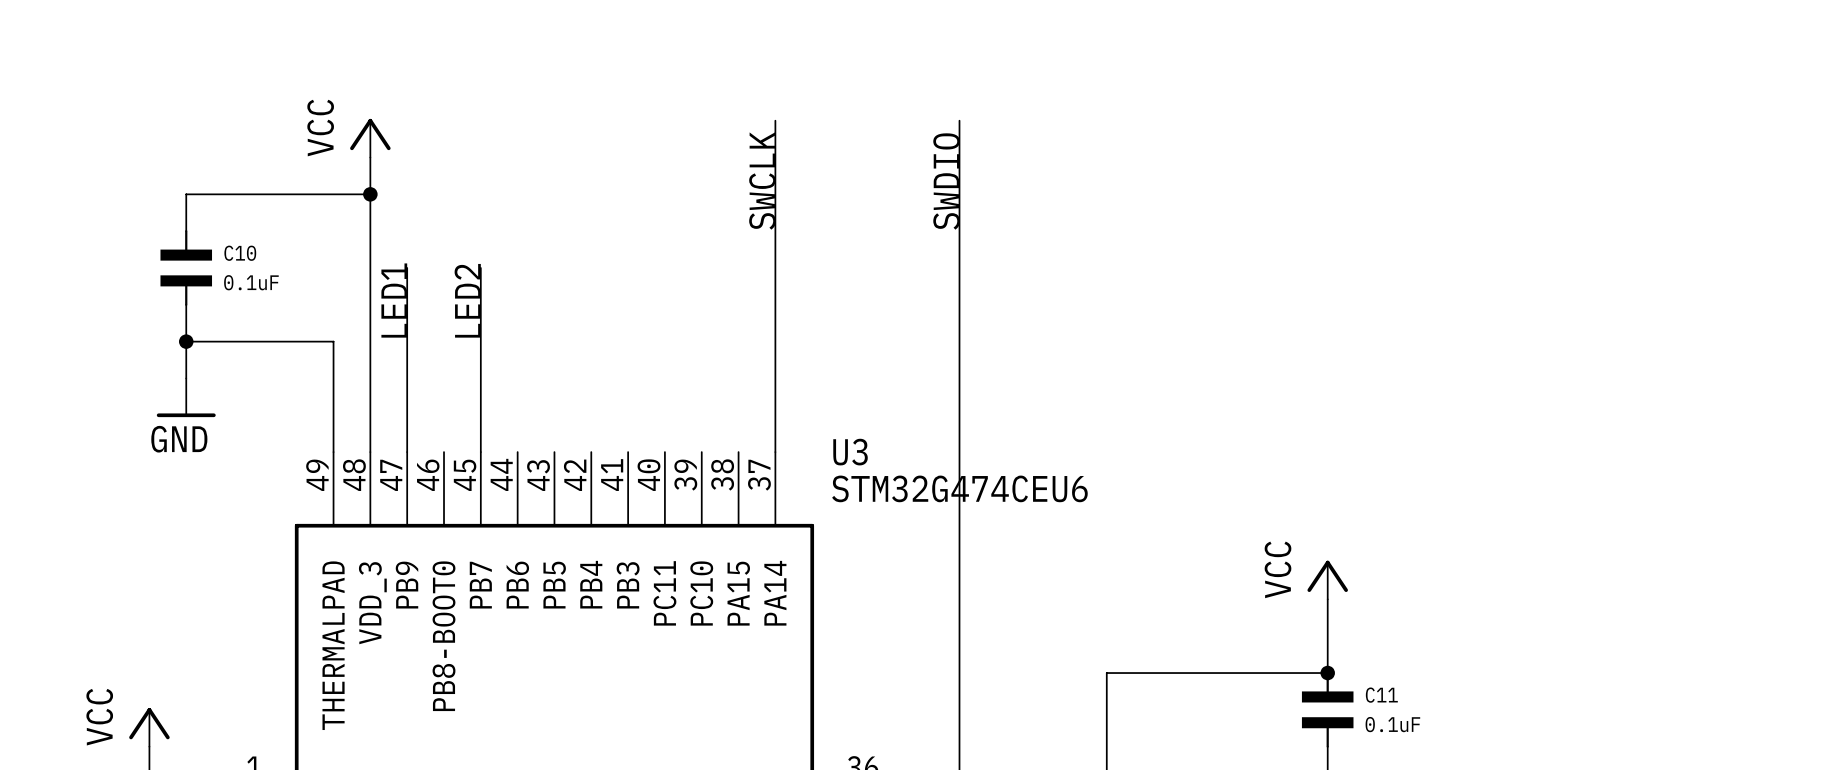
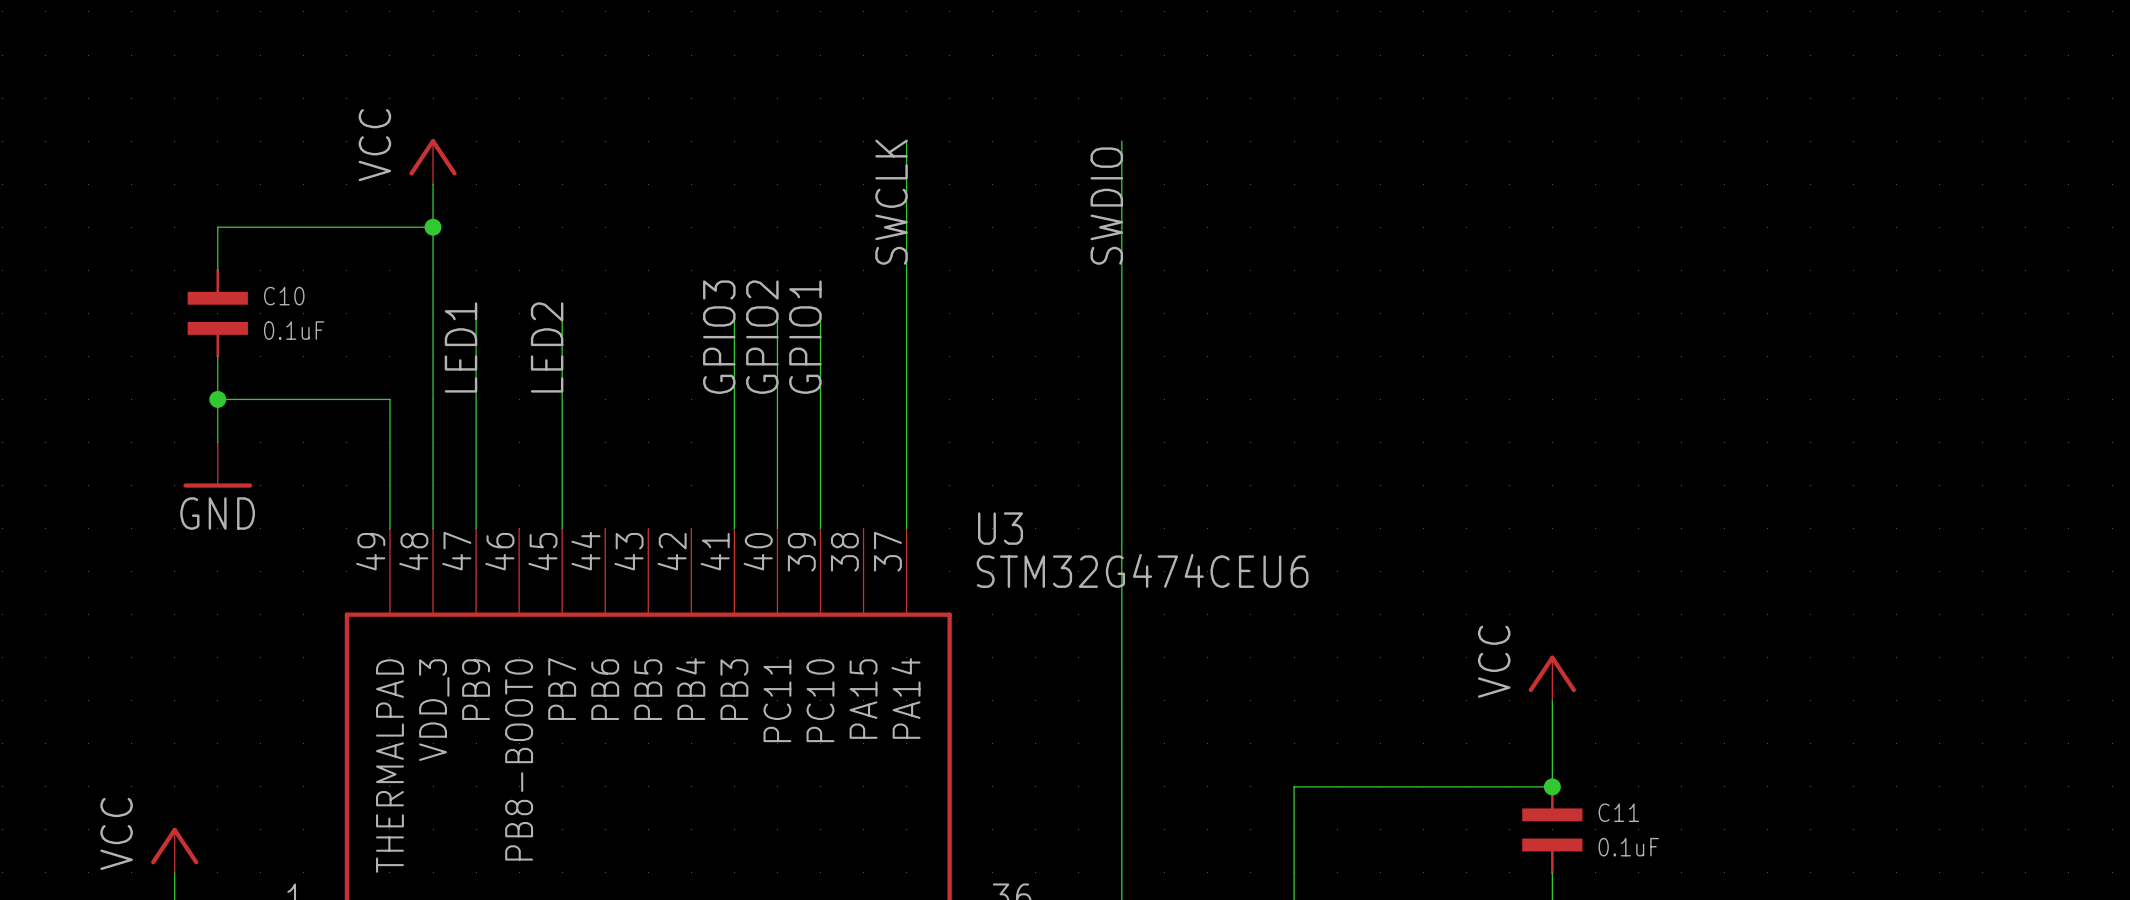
wire: none -> (734, 313) (734, 528)
wire: none -> (777, 313) (777, 528)
wire: none -> (820, 313) (820, 528)
label: none -> GPIO2 (762, 337)
label: none -> GPIO1 (805, 337)
label: none -> GPIO3 (719, 337)

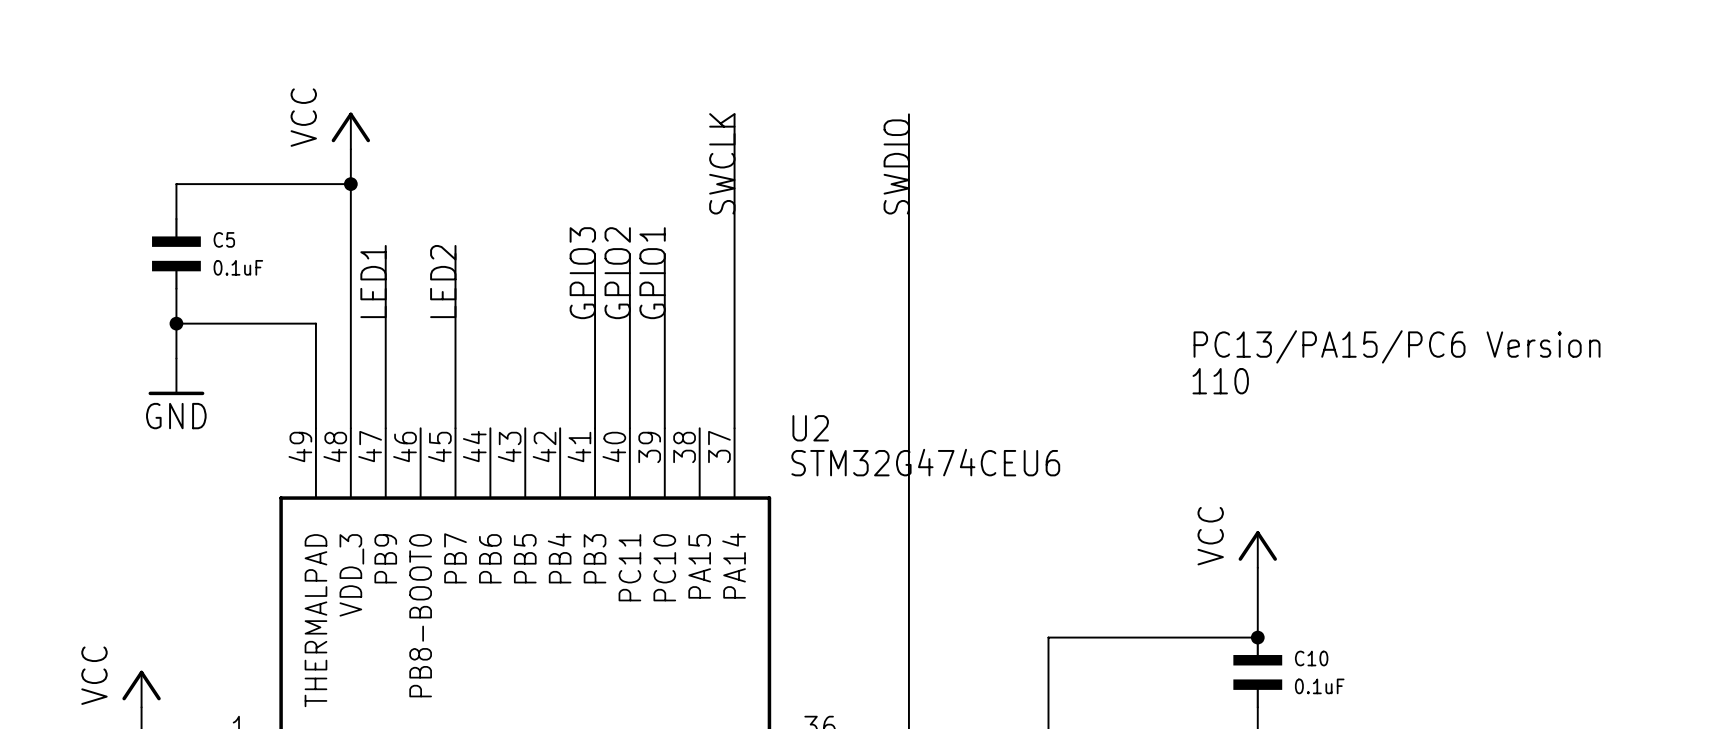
C10 name: C10 (284, 296) -> C5 (224, 239)
text: none -> PC13/PA15/PC6 Version (1397, 346)
text: none -> 110 (1220, 381)
U3 name: U3 (1000, 528) -> U2 (810, 428)
C11 name: C11 (1618, 812) -> C10 (1311, 658)

